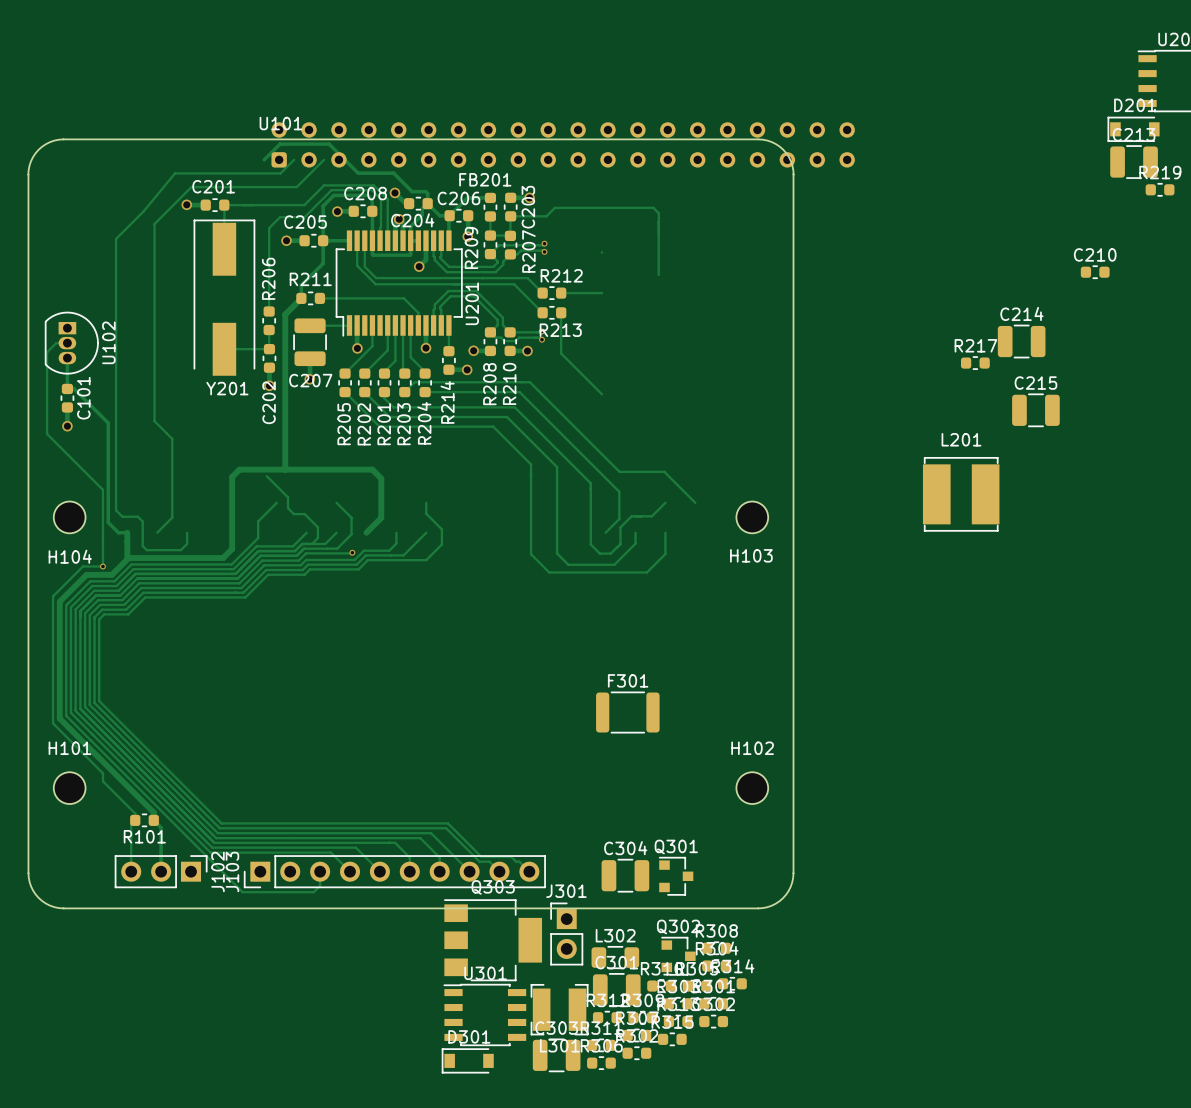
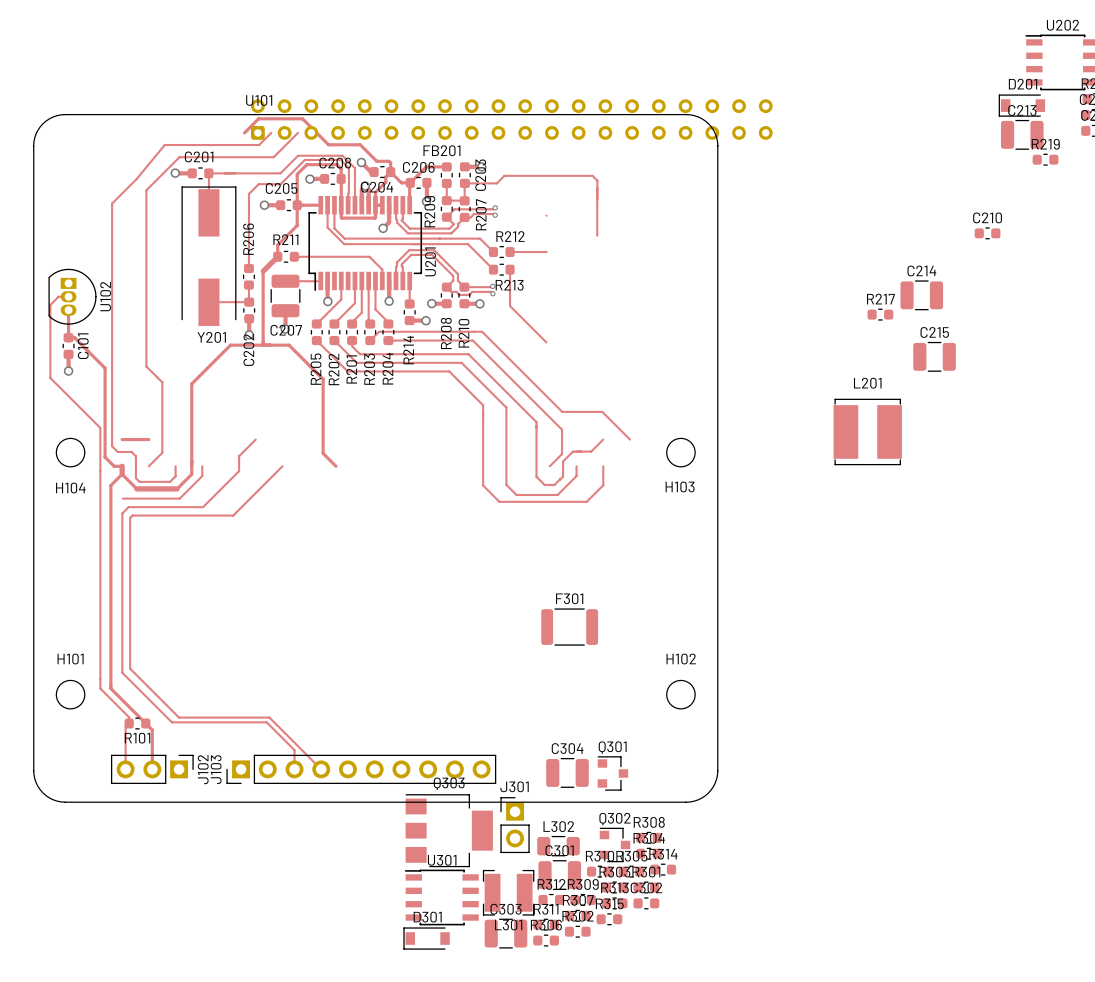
track: (285, 314) (285, 469) -> (263, 271) (263, 345)
track: (266, 476) (288, 497) (288, 508) (293, 514) (304, 514) (317, 527) (317, 538) (312, 543) -> none
track: none -> (122, 439) (148, 439)
track: (336, 502) (351, 517) (351, 534) (337, 548) (304, 548) (296, 555) (260, 555) -> none
track: (426, 502) (426, 513) (441, 529) (441, 544) (426, 560) (367, 560) (358, 569) (310, 569) (304, 574) (268, 574) (245, 597) (145, 597) (128, 614) (104, 614) (99, 619) (99, 701) (221, 823) (448, 823) (481, 856) (511, 856) (529, 871) -> none
track: none -> (202, 466) (202, 476) (179, 498) (122, 498)
track: (336, 532) (325, 543) (302, 543) (295, 551) (258, 551) (235, 573) (135, 573) (118, 590) (94, 590) (75, 609) (75, 710) (212, 847) (355, 847) (379, 871) -> none
track: (366, 532) (381, 517) (381, 478) (372, 469) (239, 469) (232, 476) (232, 548) (223, 558) (188, 558) -> (335, 466) (323, 453) (323, 379) (289, 345) (230, 345) (191, 383) (191, 474) (177, 488)
track: (396, 532) (396, 543) (389, 550) (363, 550) (354, 559) (306, 559) (300, 565) (264, 565) (241, 588) (141, 588) (124, 604) (100, 604) (89, 615) (89, 704) (190, 805) -> none
track: (426, 532) (403, 555) (365, 555) (356, 564) (308, 564) (302, 570) (266, 570) (243, 592) (143, 592) (129, 606) -> none
track: (127, 541) (127, 558) -> none
track: (293, 546) (256, 546) (233, 569) (133, 569) (116, 586) (92, 586) (70, 607) (70, 712) (210, 852) (330, 852) -> (270, 478) (233, 515) (132, 515) (130, 517) (130, 668) (179, 717) (269, 717) (304, 752)
track: (352, 552) (306, 553) (298, 560) (262, 560) (239, 583) (139, 583) (122, 600) (98, 600) (85, 613) (85, 706) (137, 759) -> none
via: (352, 552) -> none
track: (296, 555) (260, 555) (237, 578) (137, 578) (120, 595) (96, 595) (80, 611) (80, 708) (95, 724) -> none
track: (127, 558) (111, 574) (86, 574) (59, 601) (59, 718) (98, 756) -> none
track: (127, 558) (143, 558) -> none
track: (231, 564) (131, 564) (114, 581) (90, 581) (66, 605) (66, 715) (90, 740) -> none
track: (102, 566) (82, 566) (53, 596) (53, 723) (102, 773) -> (100, 496) (100, 681)
via: (102, 566) -> none
track: (128, 606) (126, 609) (102, 609) (94, 617) (94, 702) (219, 828) (446, 828) (479, 861) (489, 861) (499, 871) -> none
track: (82, 710) (214, 842) -> none
track: (90, 740) (242, 892) (313, 892) (320, 885) (320, 871) -> (215, 494) (203, 507) (128, 507) (122, 513) (122, 672) (171, 722) (266, 722) (294, 750) (294, 769)
track: (98, 756) (153, 812) (153, 820) -> (136, 488) (122, 474) (110, 485) (110, 688) (145, 723)
track: (137, 759) (216, 838) (420, 838) (439, 857) (439, 871) -> none
track: (190, 806) (217, 833) (431, 833) (469, 871) -> none
track: (214, 842) (395, 842) (409, 857) (409, 871) -> none

